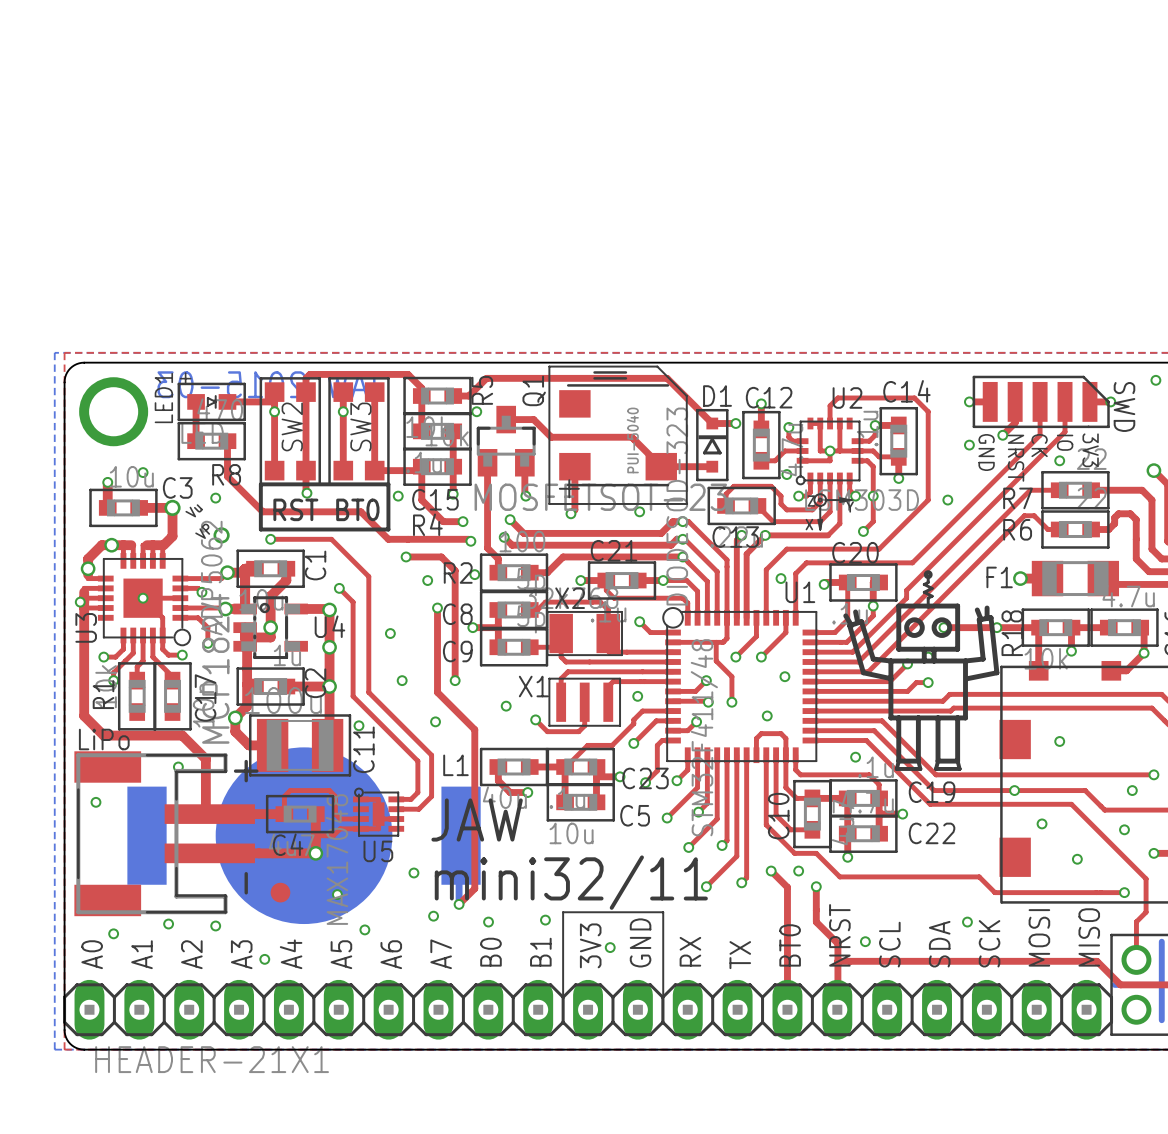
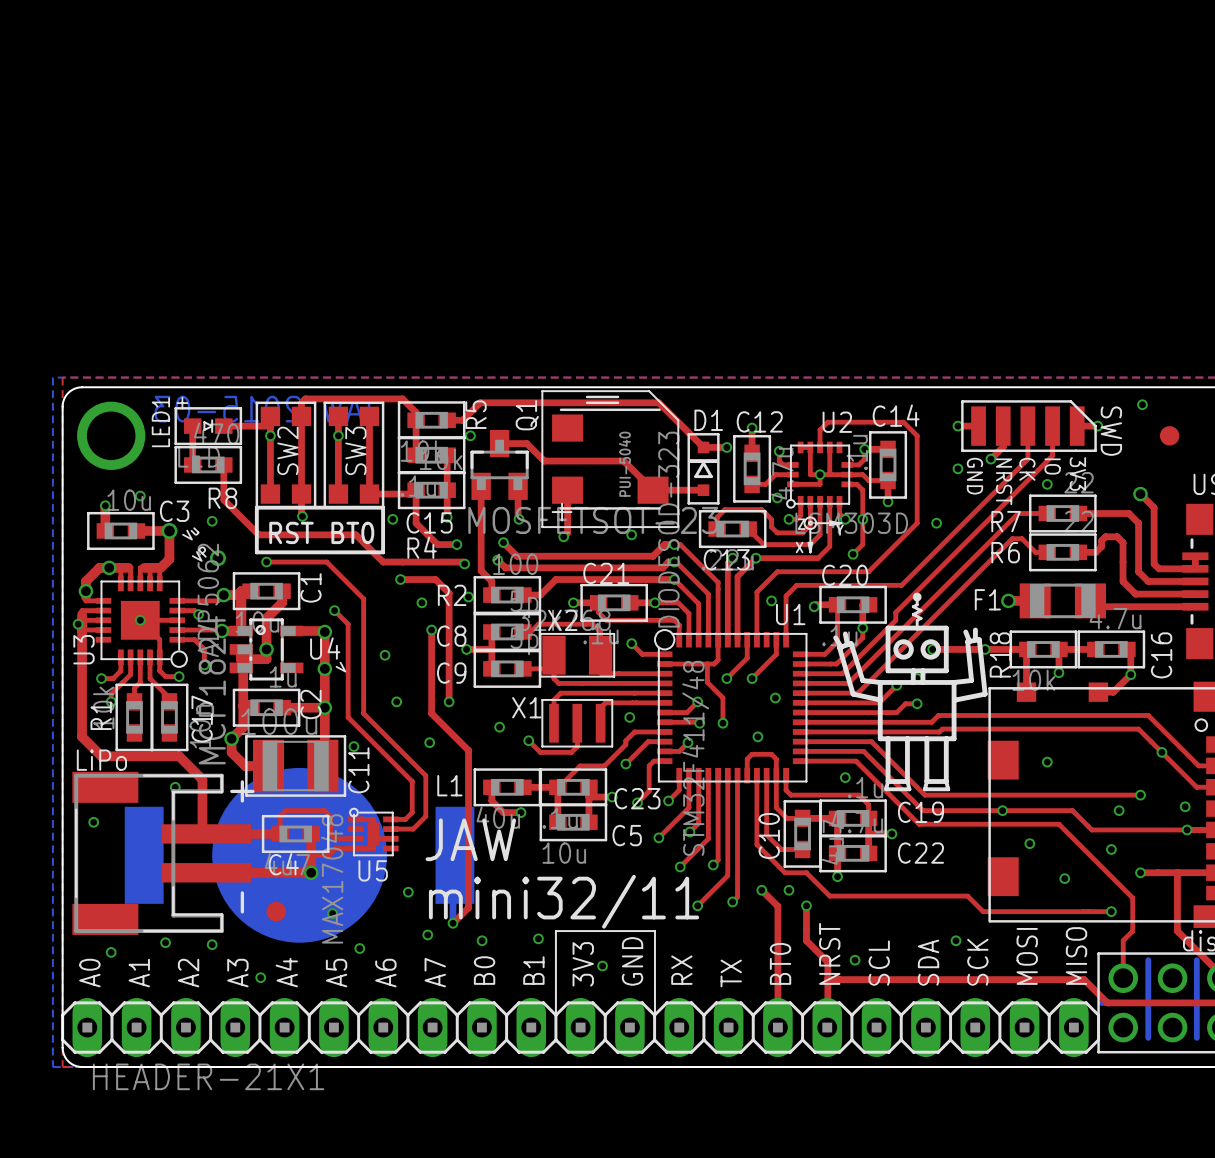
text: none -> V (340, 667)

